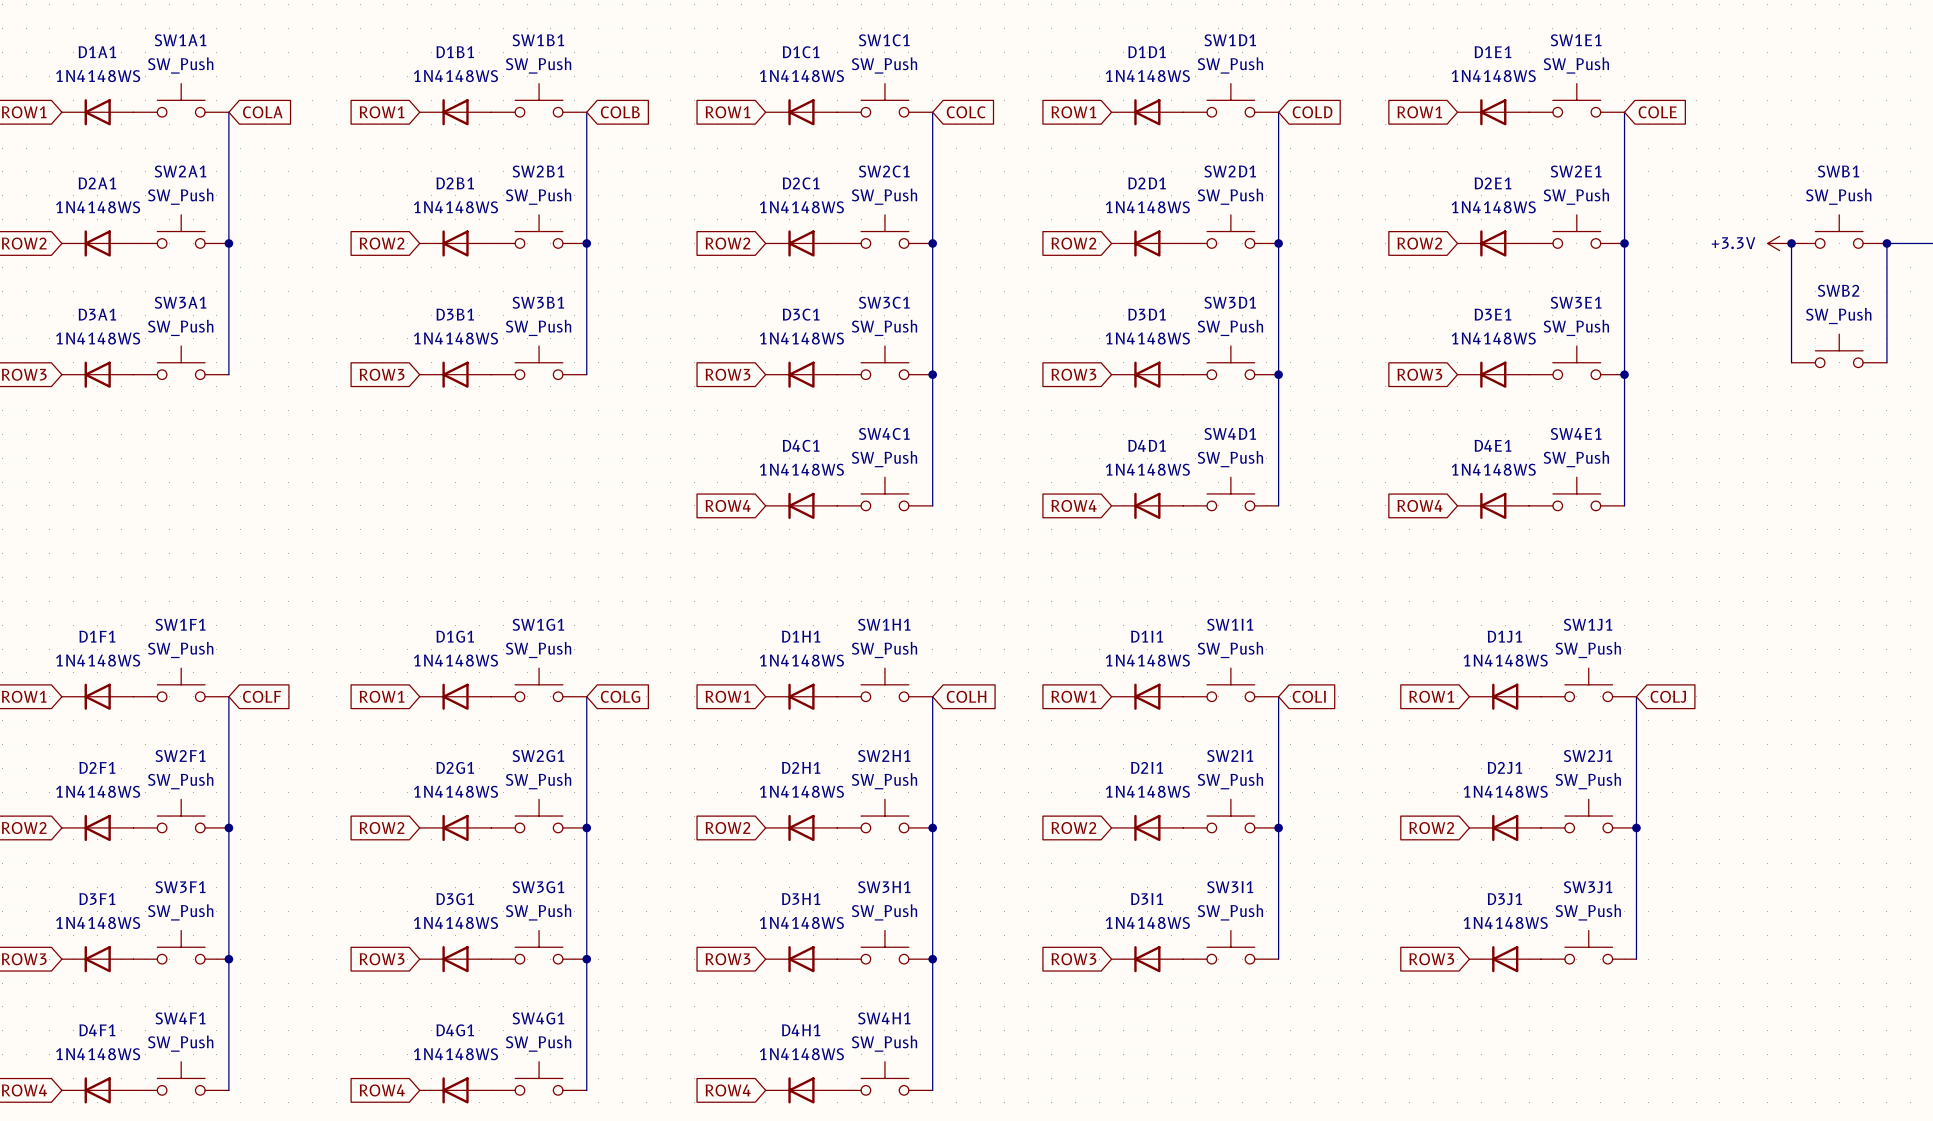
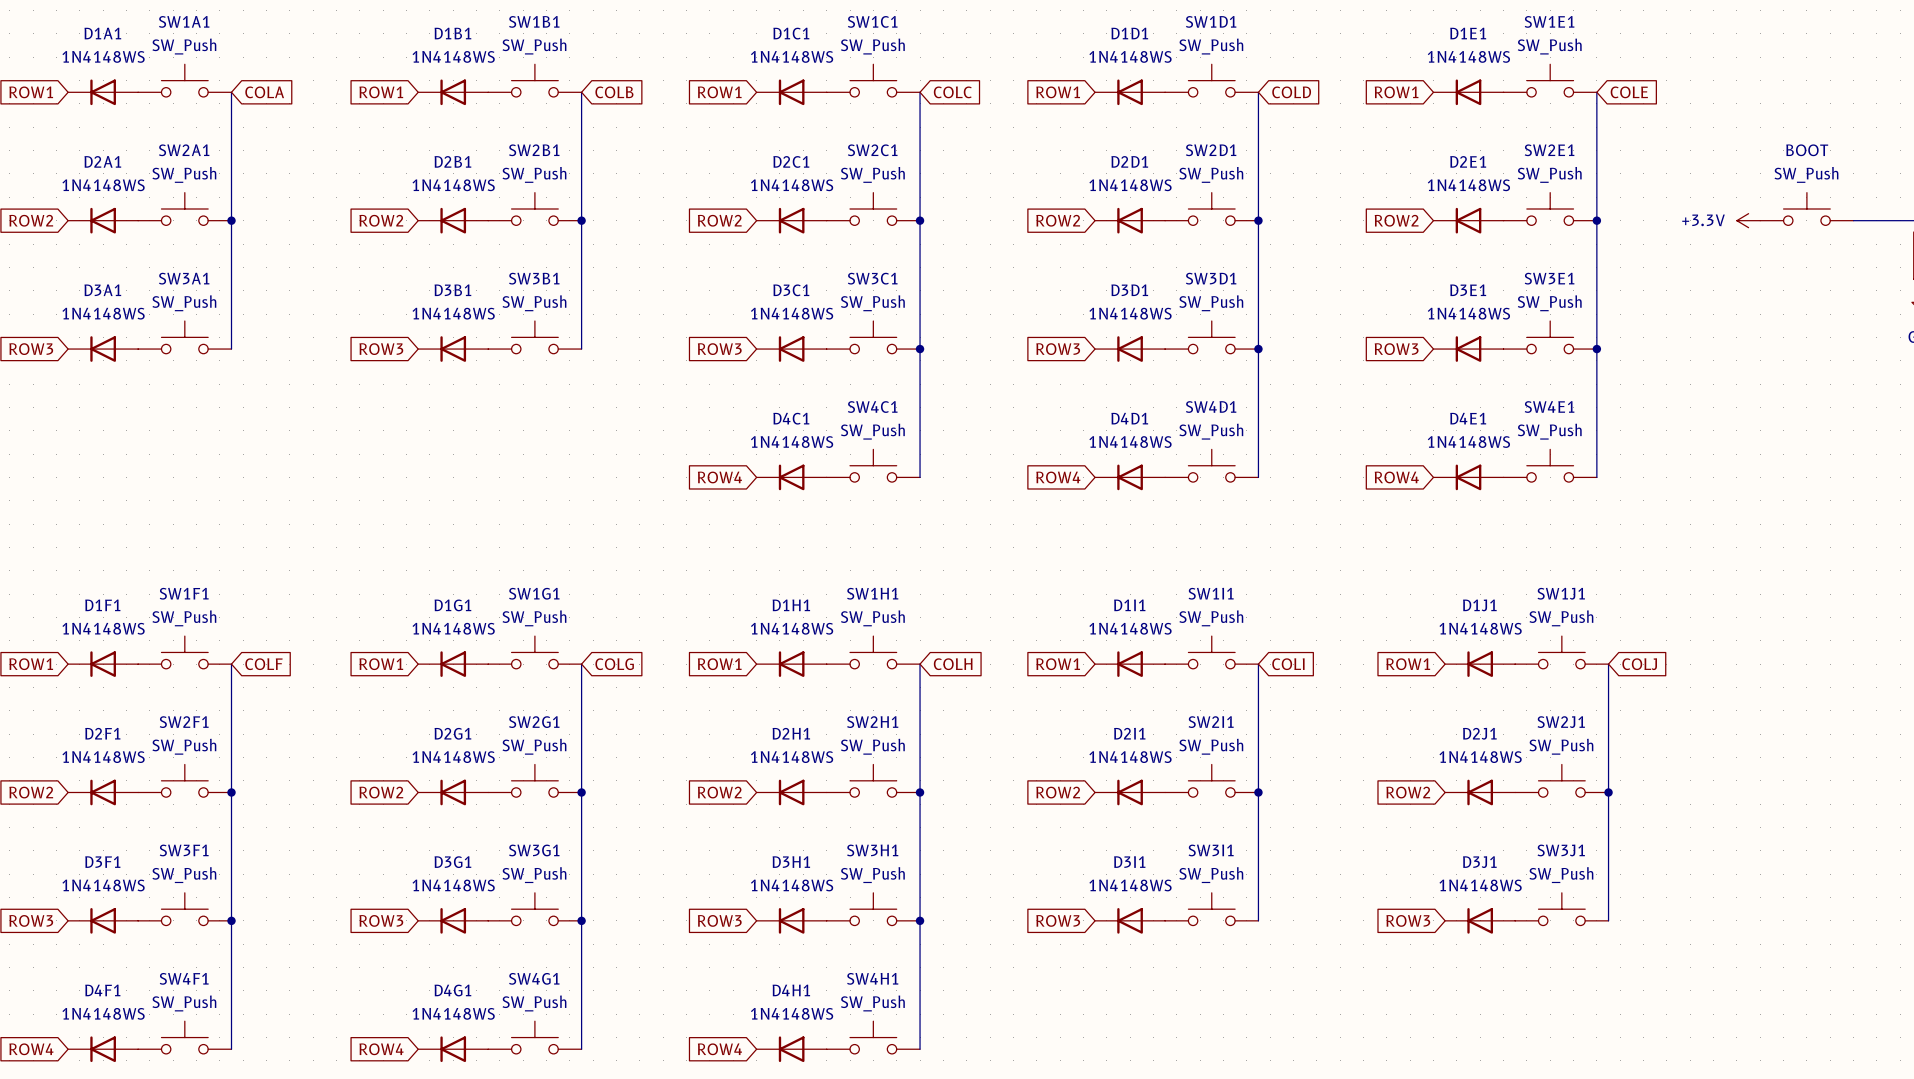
SWB1 name: SWB1 (1838, 171) -> BOOT (1807, 150)
wire: (1791, 243) (1791, 362) -> none
junction: (1791, 243) -> none
wire: (1886, 243) (1886, 362) -> none
junction: (1886, 243) -> none
SWB2: SW_Push (1839, 350) -> none

